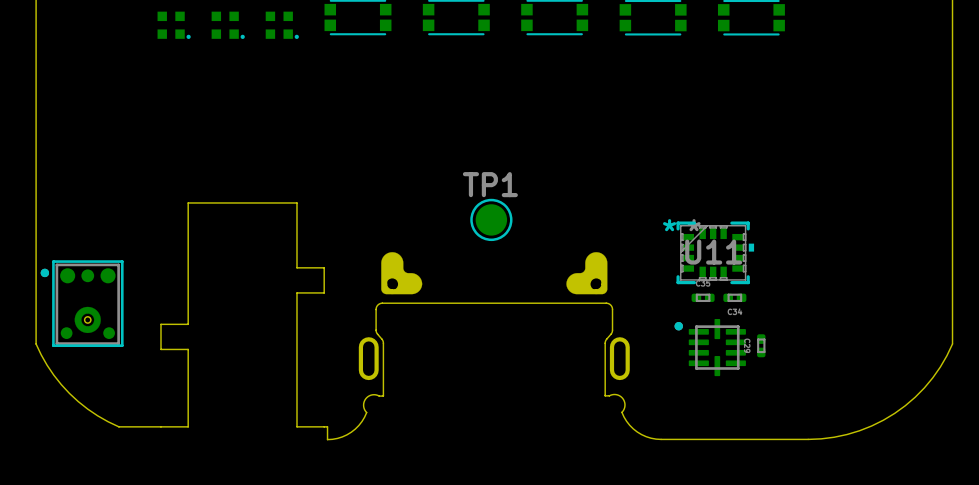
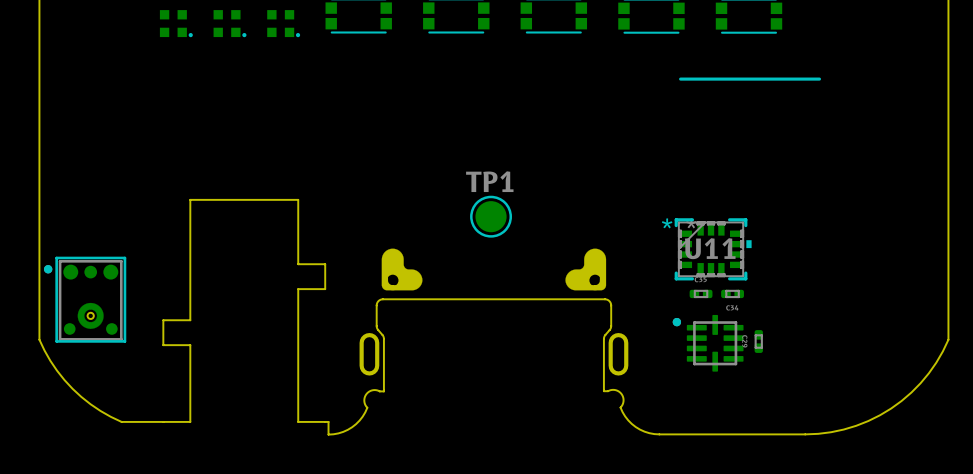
line: none -> (819, 79) (680, 79)

